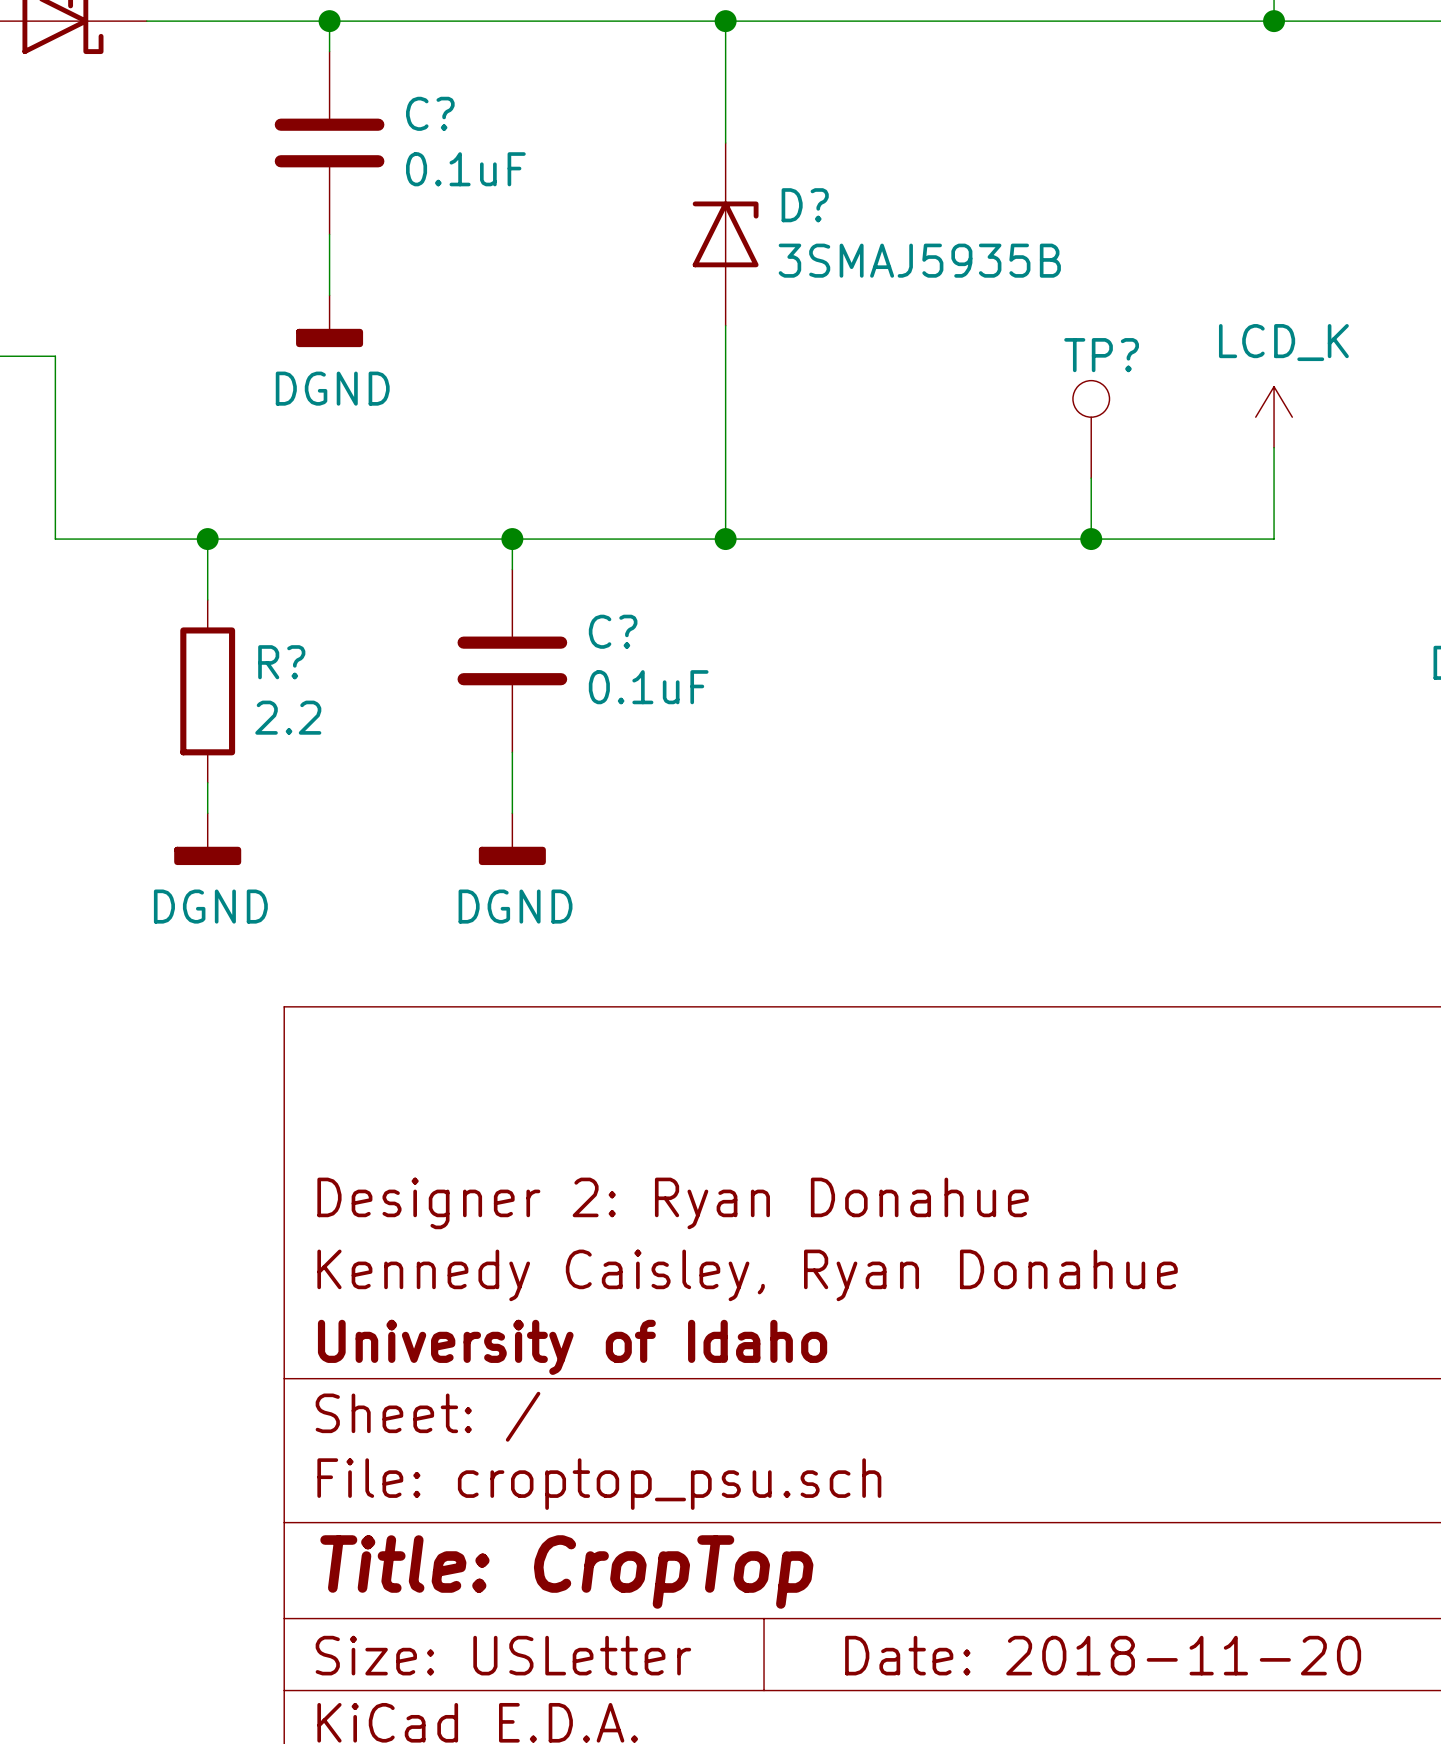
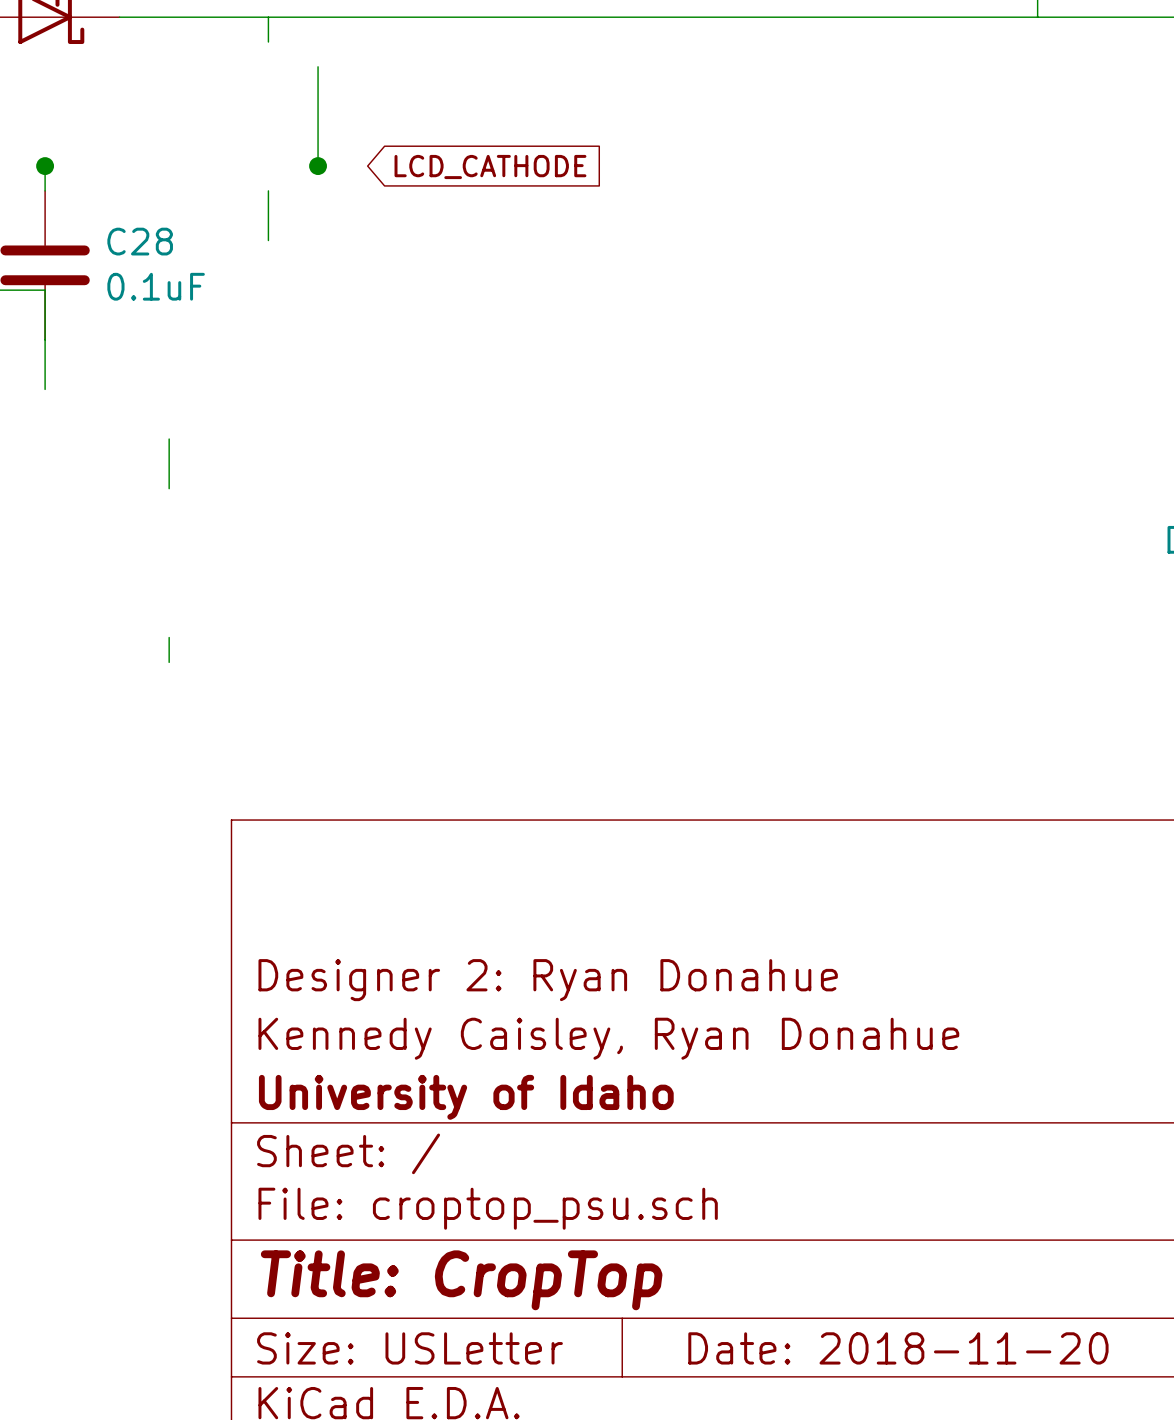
junction: (329, 21) -> none
wire: (725, 21) (725, 142) -> (318, 66) (318, 166)
junction: (725, 21) -> none
junction: (1274, 21) -> none
C?: 0.1uF (329, 142) -> none
junction: none -> (45, 166)
junction: none -> (318, 166)
global label: none -> LCD_CATHODE (490, 167)
D?: 3SMAJ5935B (725, 234) -> none
power symbol: DGND (329, 321) -> none
C28: none -> 0.1uF (45, 265)
wire: (725, 325) (725, 539) -> none
power symbol: LCD_K (1274, 417) -> none
TP?: (1091, 429) -> none
wire: (1274, 447) (1274, 539) (55, 539) (55, 478) -> none
wire: (1091, 478) (1091, 539) -> none
junction: (207, 539) -> none
wire: (512, 539) (512, 569) -> (45, 166) (45, 190)
junction: (512, 539) -> none
junction: (725, 539) -> none
junction: (1091, 539) -> none
C?: 0.1uF (512, 660) -> none
R?: 2.2 (207, 691) -> none
wire: (512, 752) (512, 813) -> none
power symbol: DGND (207, 839) -> none
power symbol: DGND (512, 839) -> none

